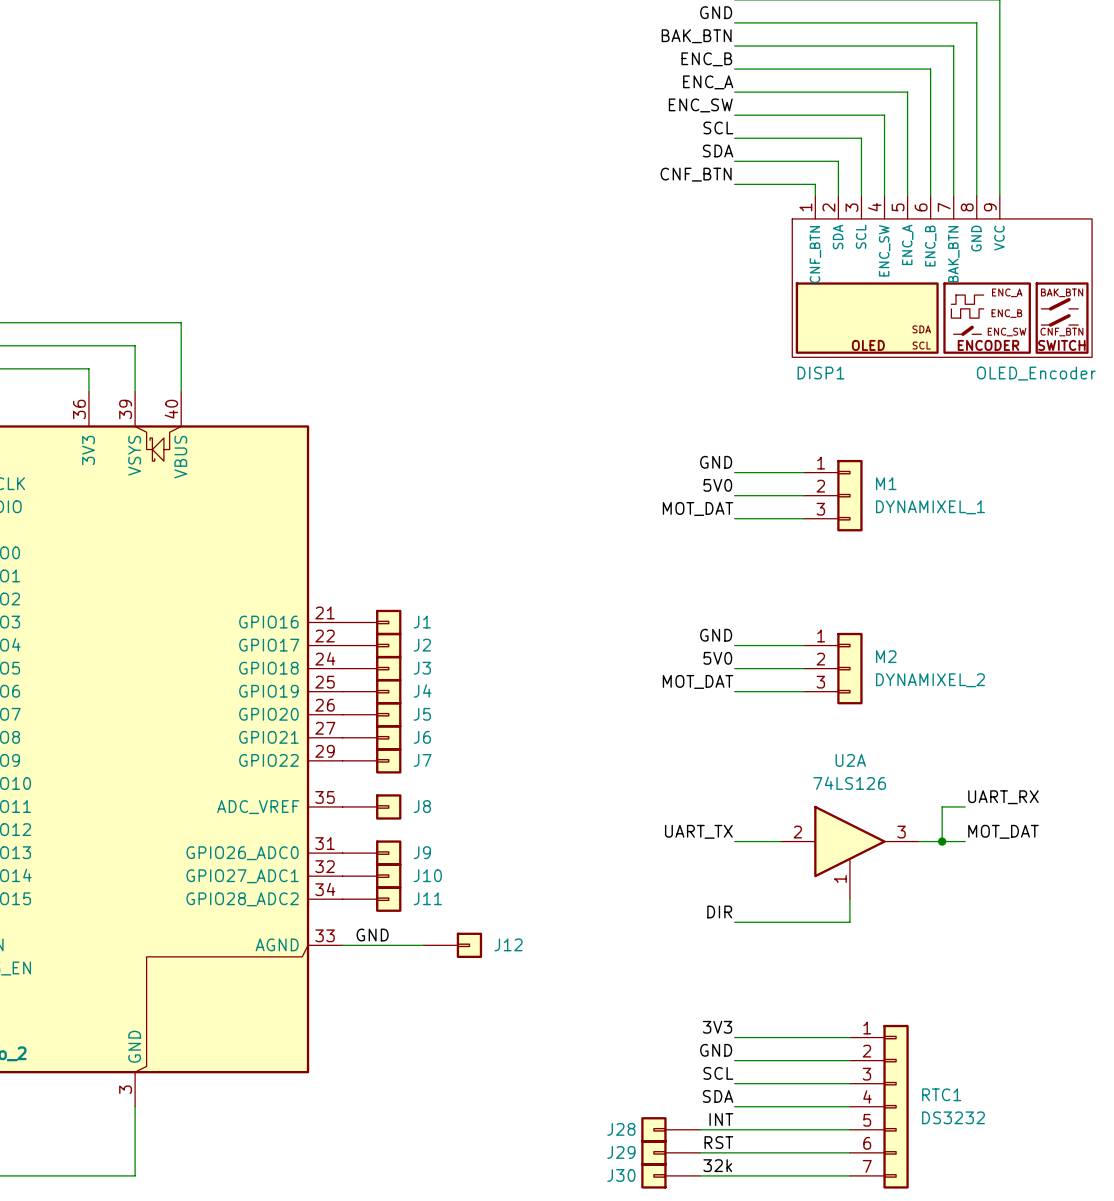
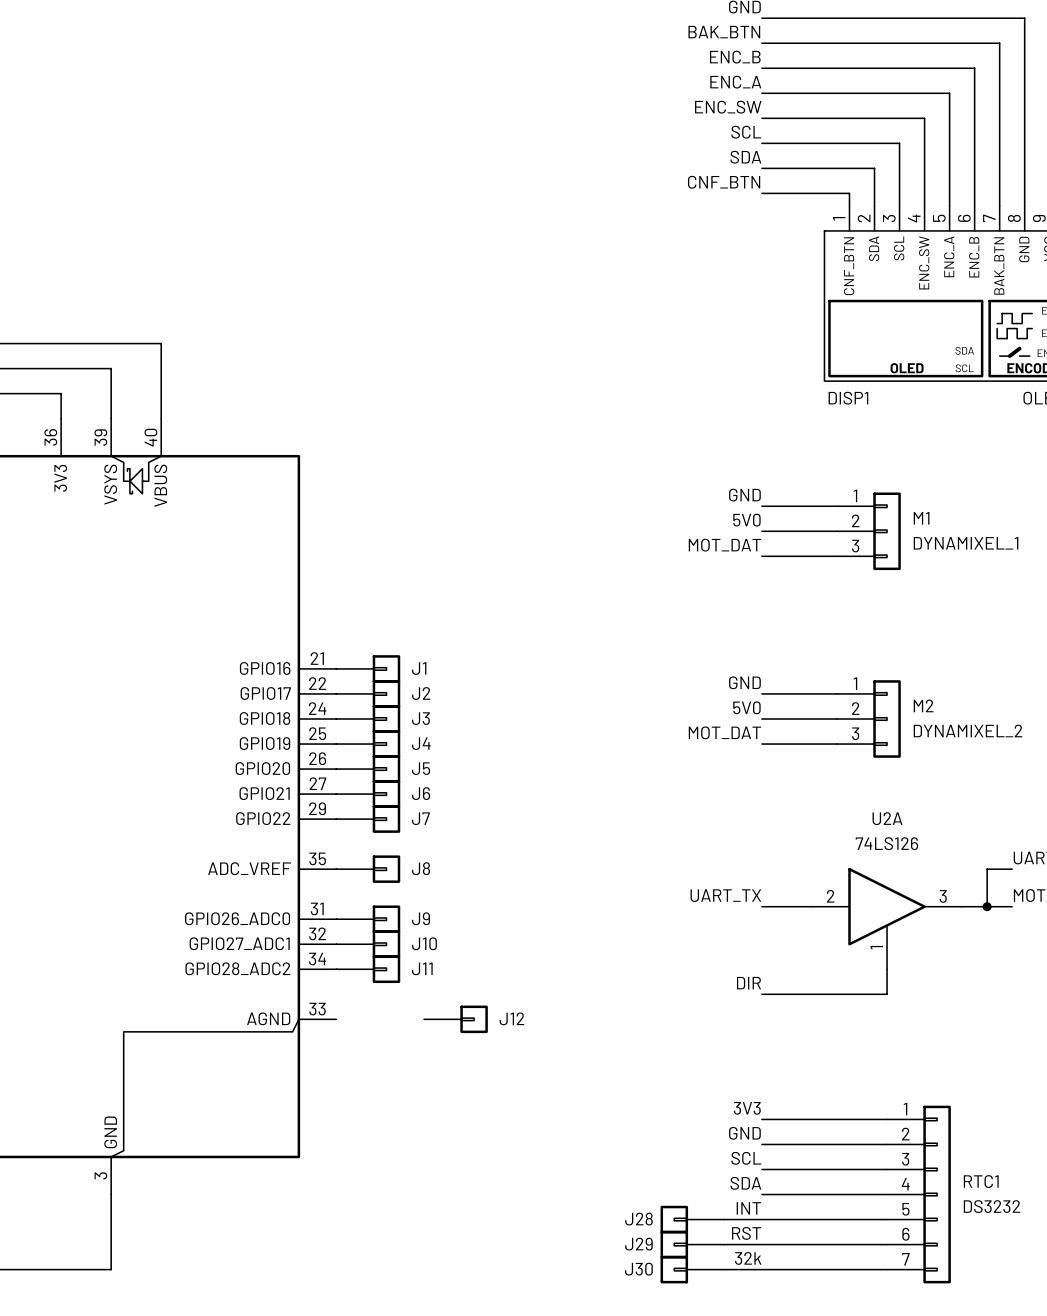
label: GND (372, 935) -> none
wire: (342, 945) (423, 945) -> none

